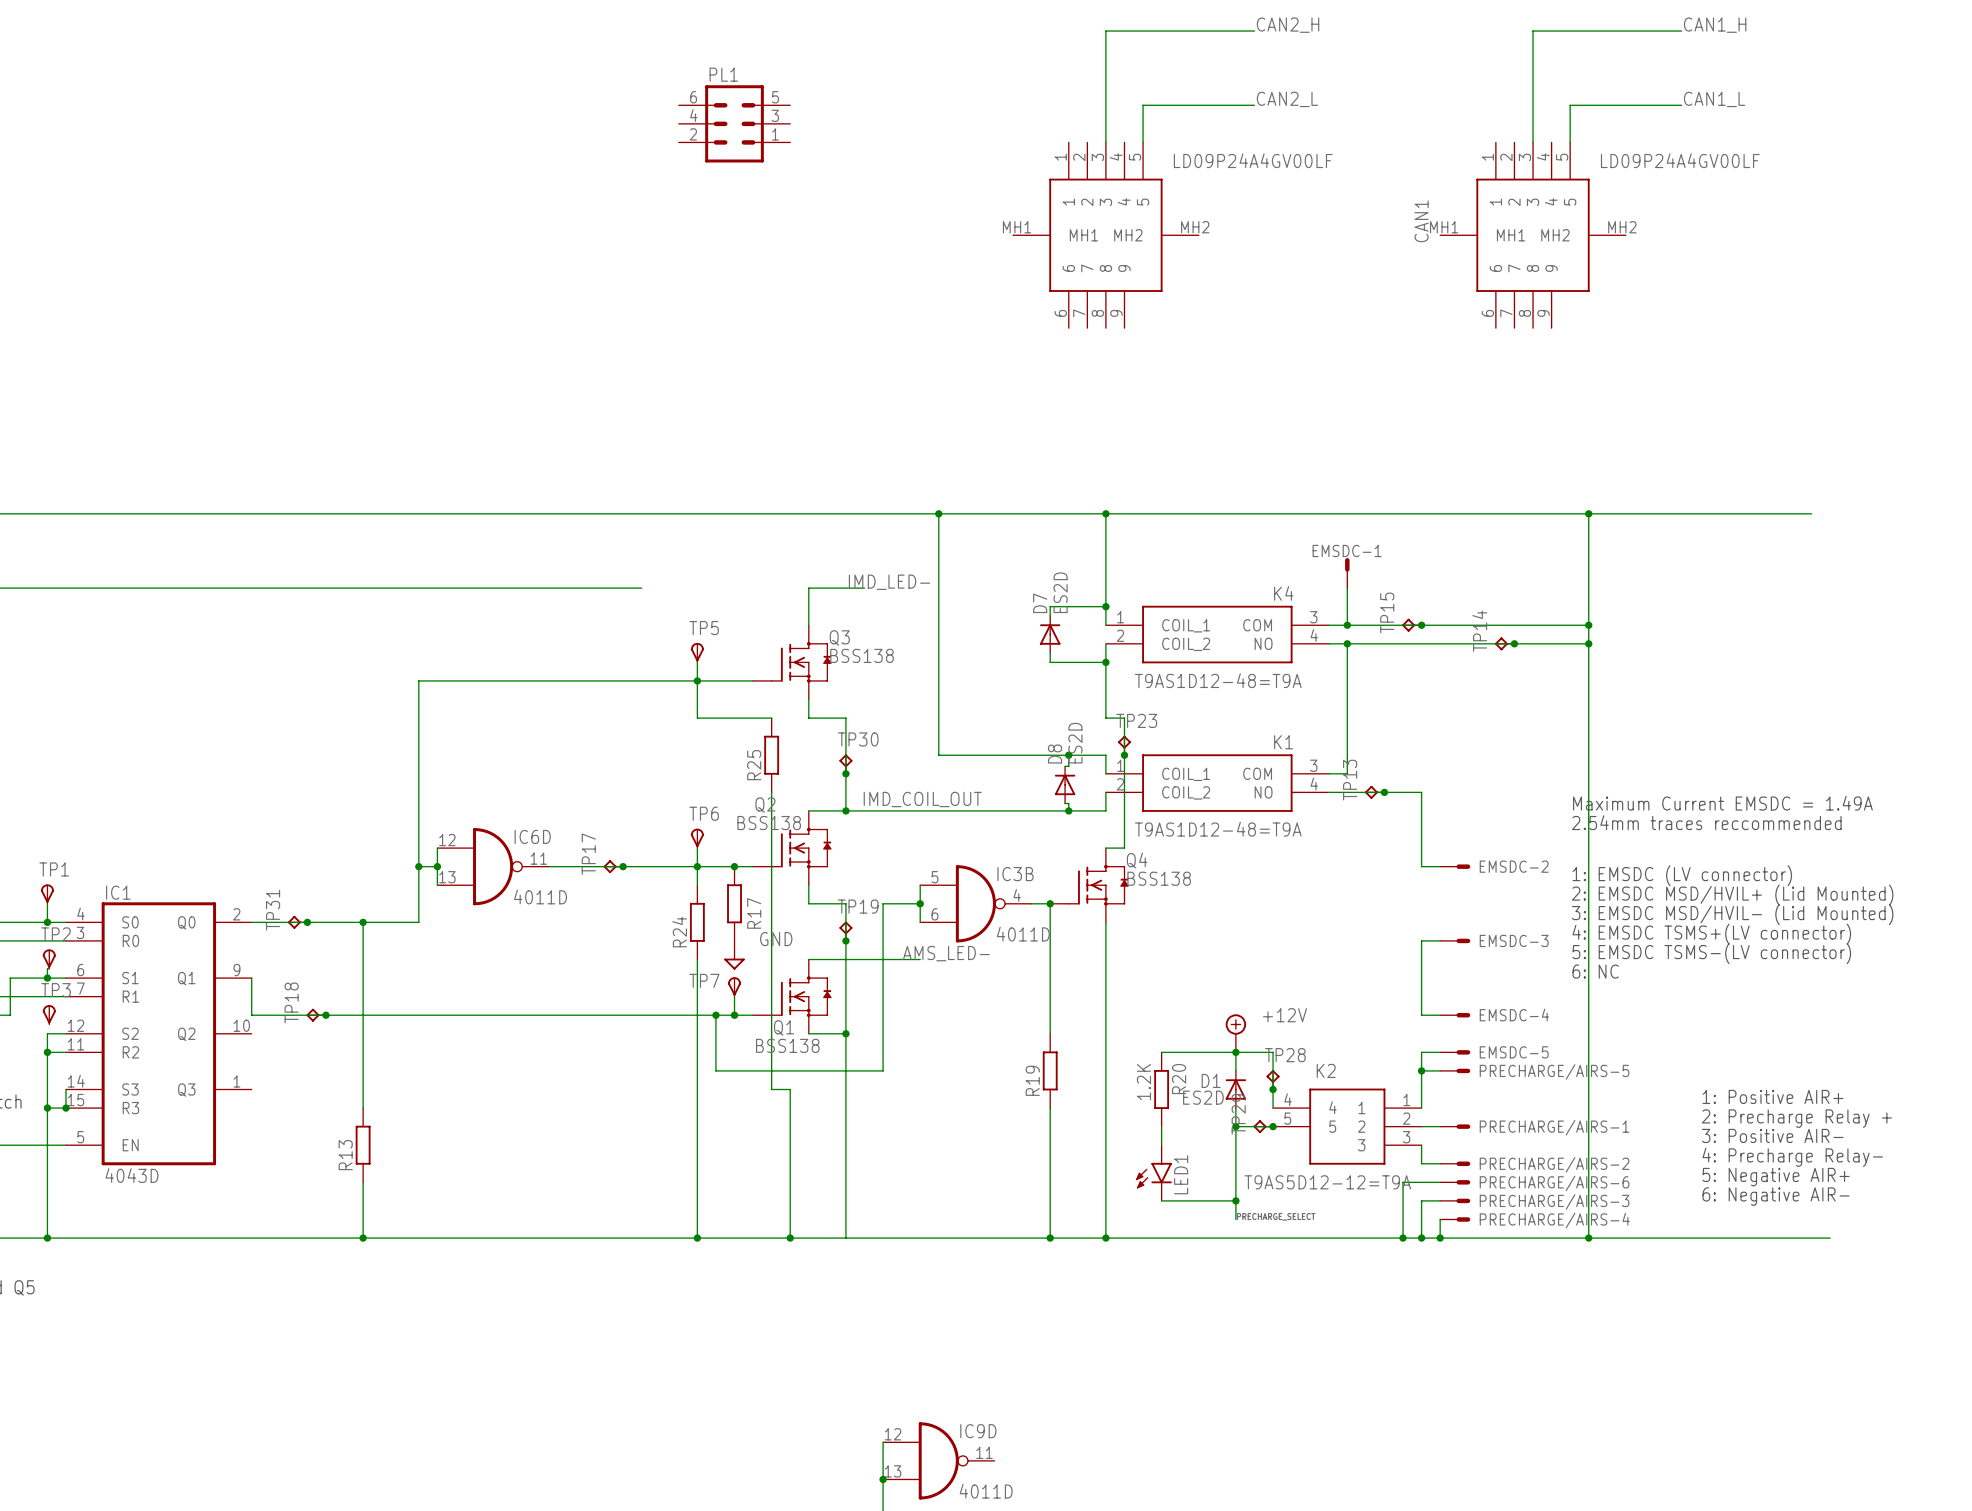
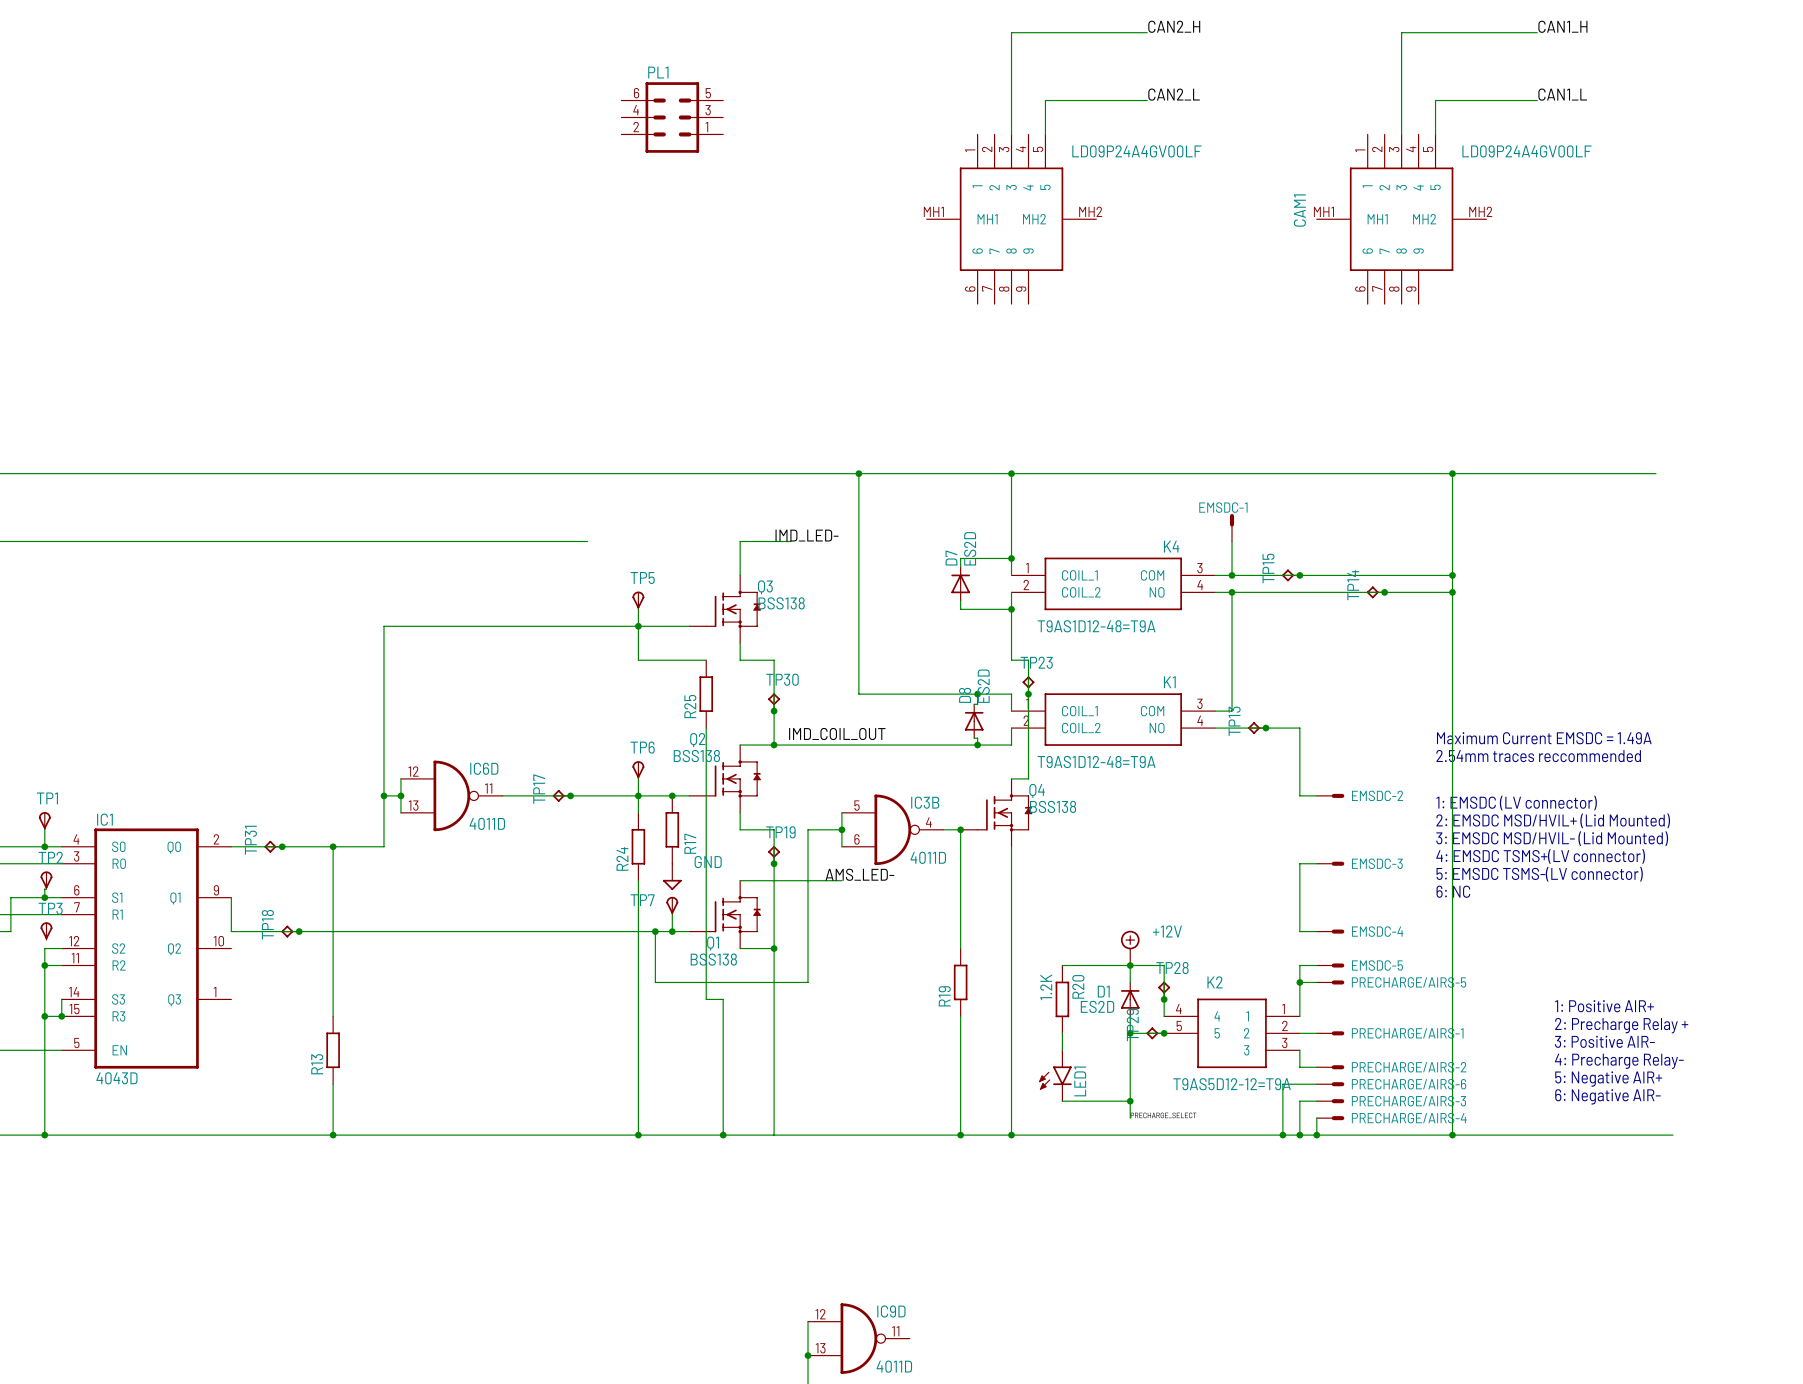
CAN1 name: CAN1 (1421, 221) -> CAM1 (1299, 210)

